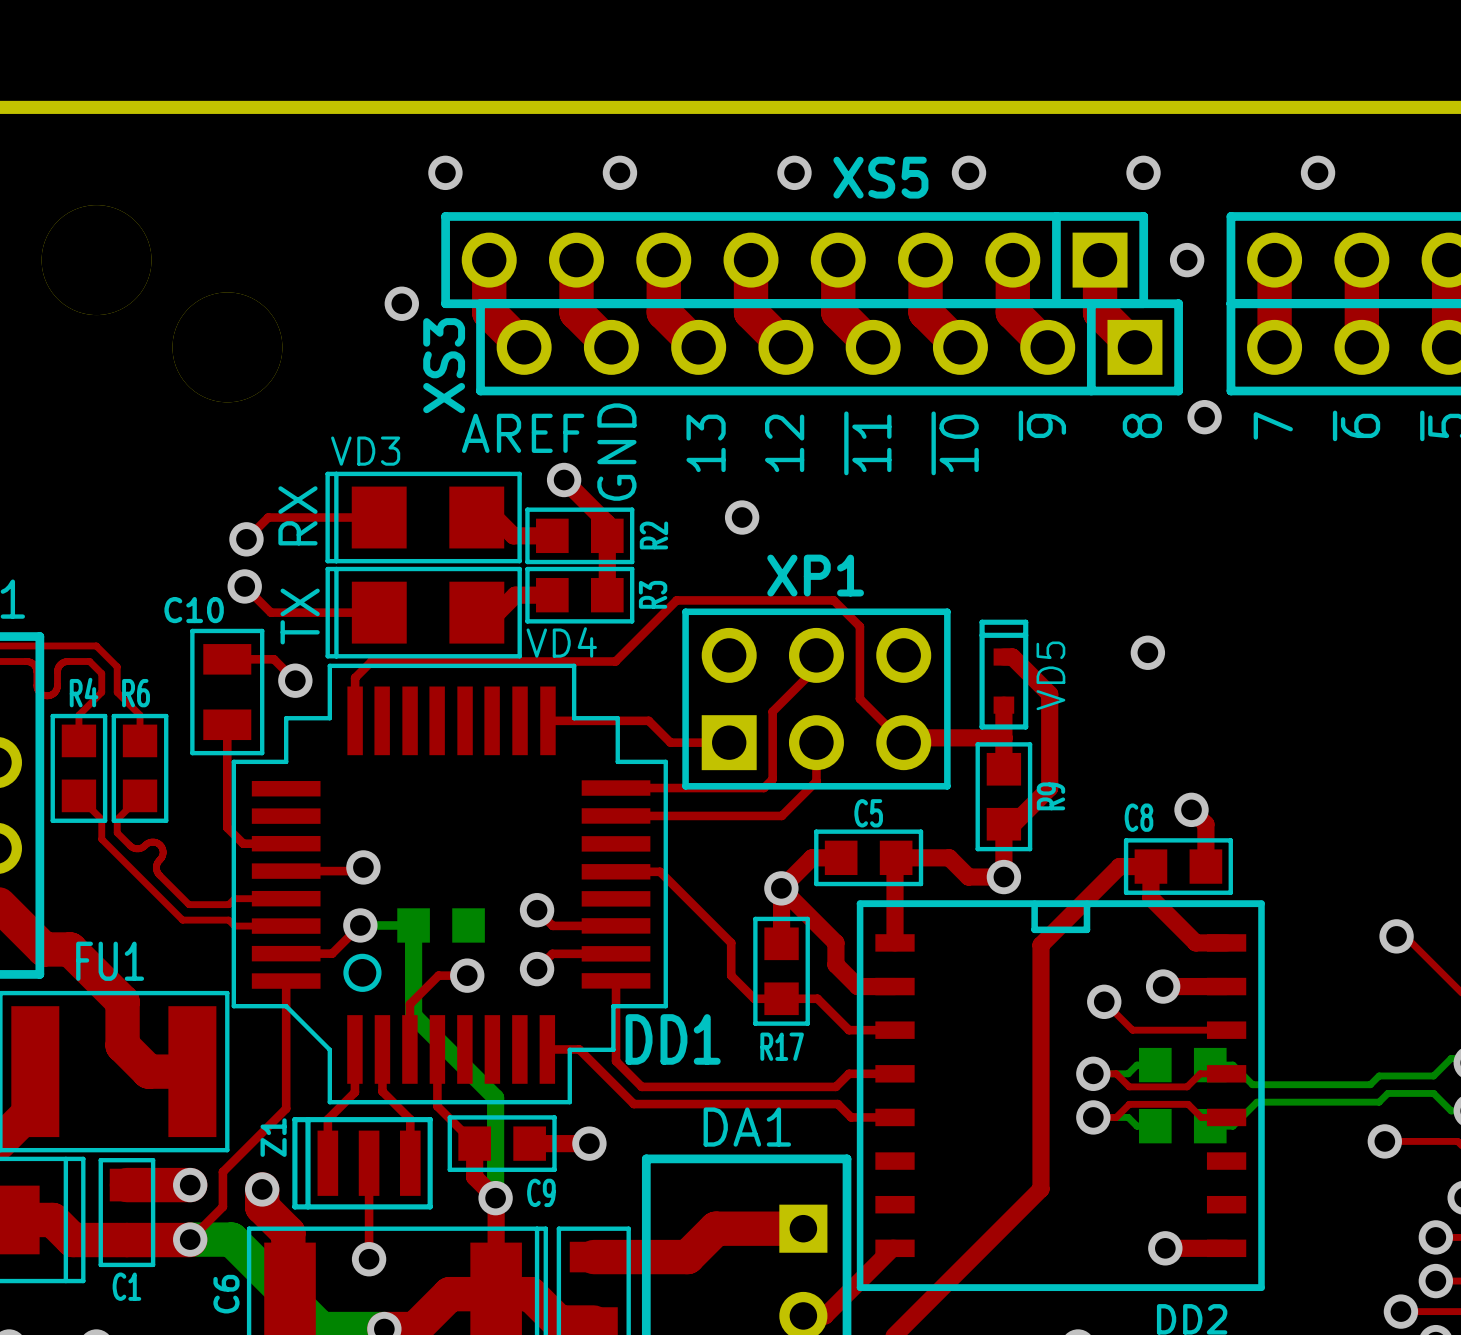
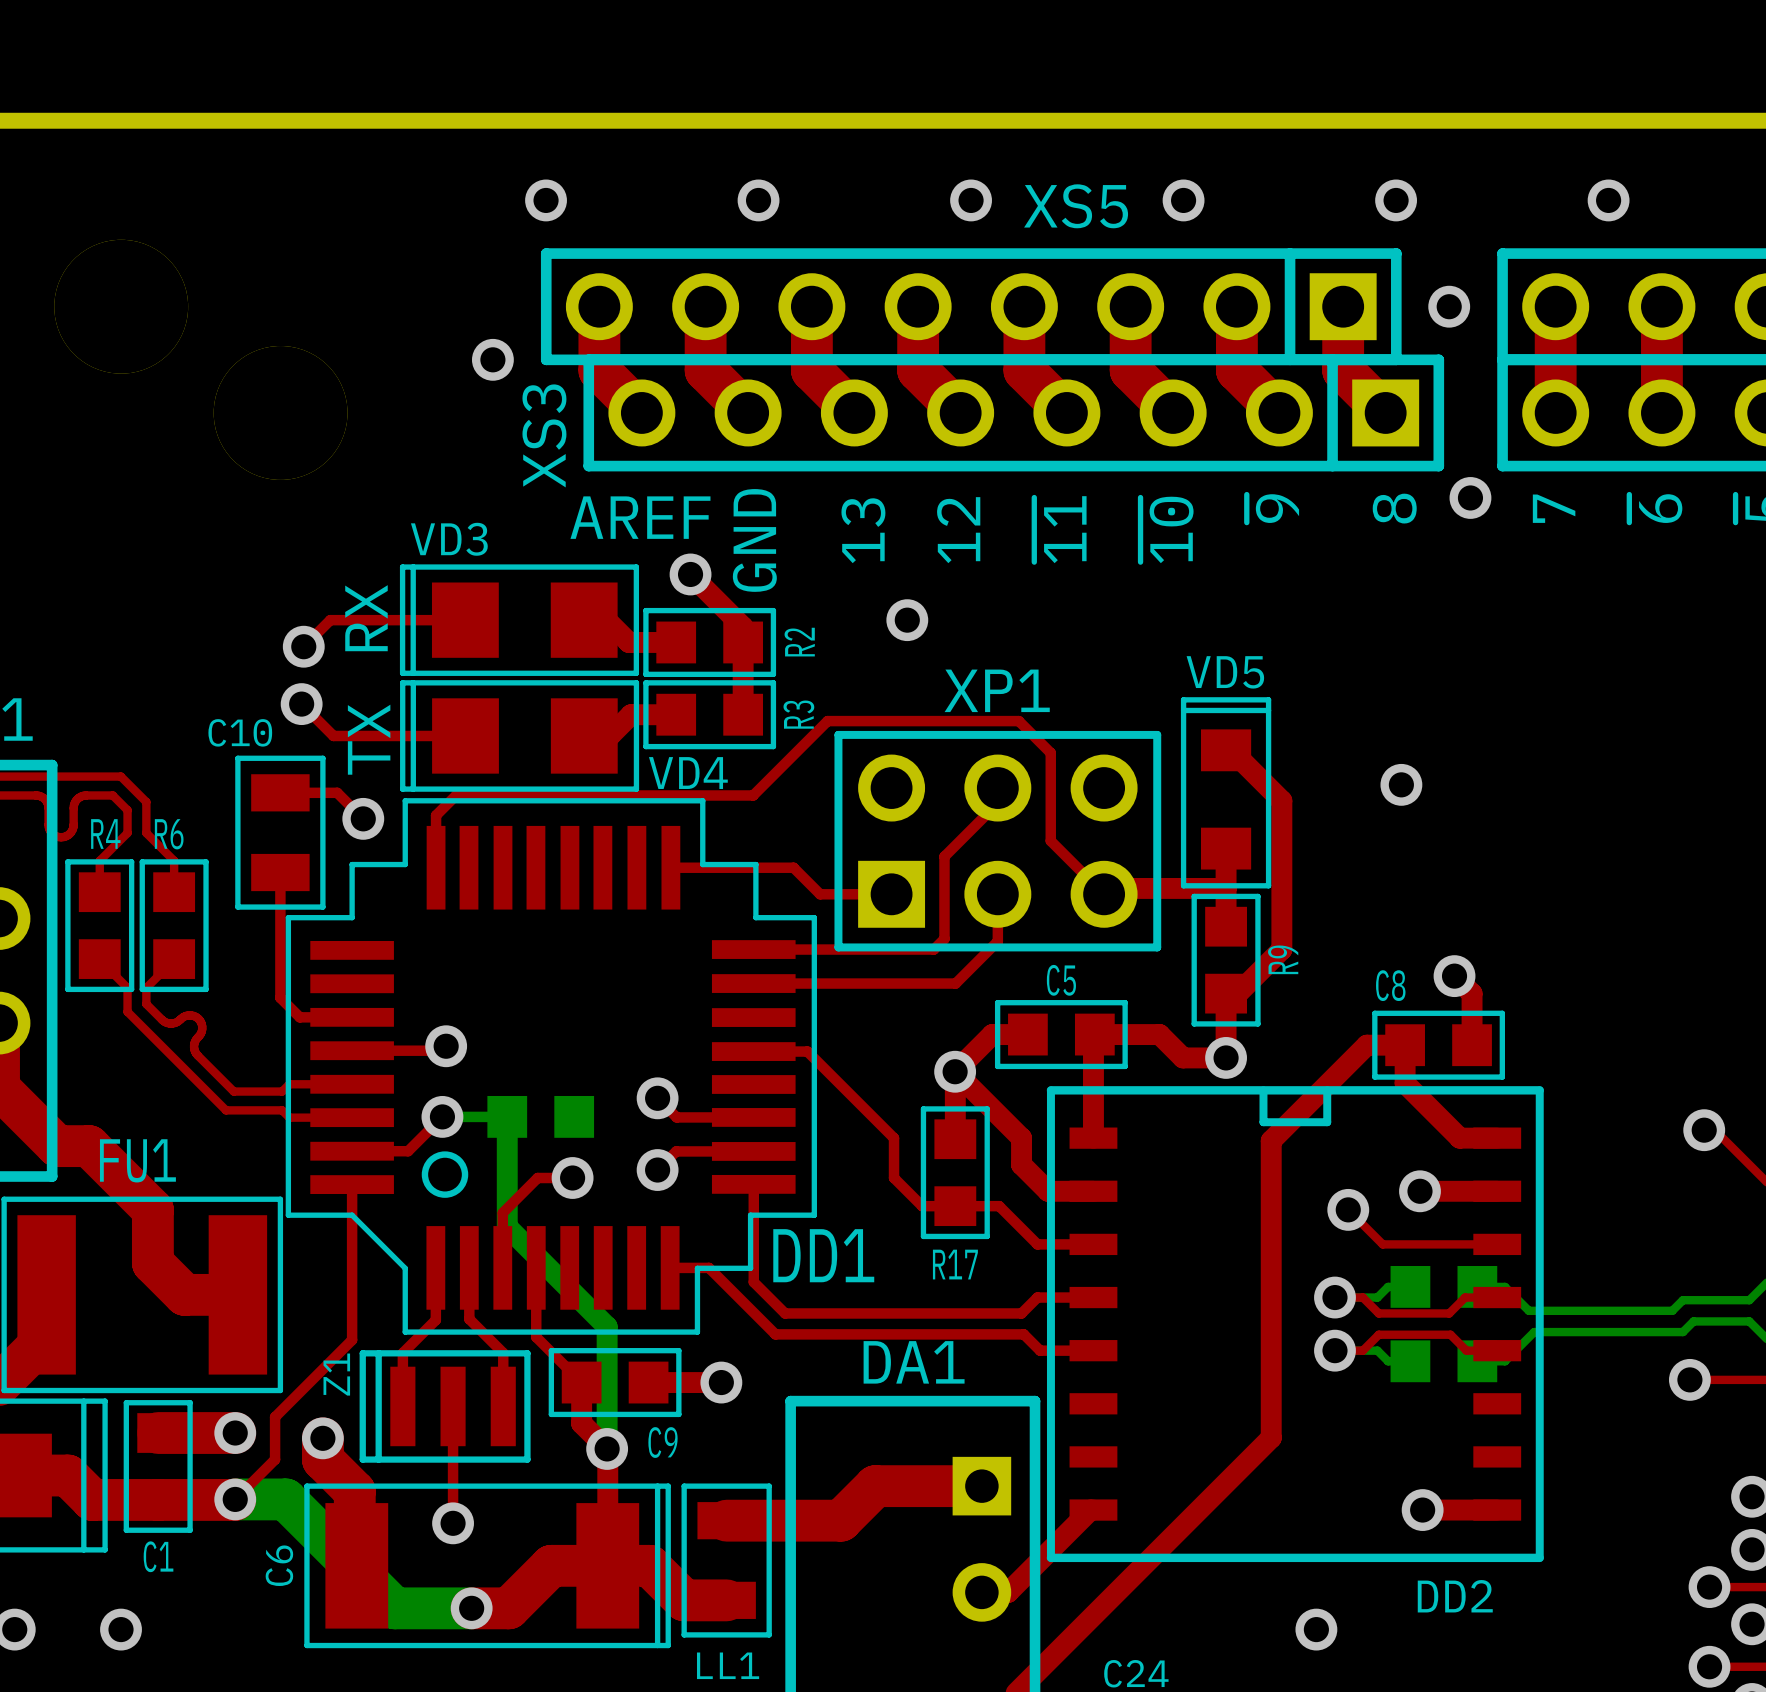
VD5 footprint: [979, 619, 1029, 730] -> [1180, 697, 1272, 889]
top track: (1003, 657) (1012, 657) (1049, 694) -> (1226, 750) (1231, 750) (1281, 800) (1281, 835)
VD5 name position: VD5 (1050, 675) -> VD5 (1225, 672)

